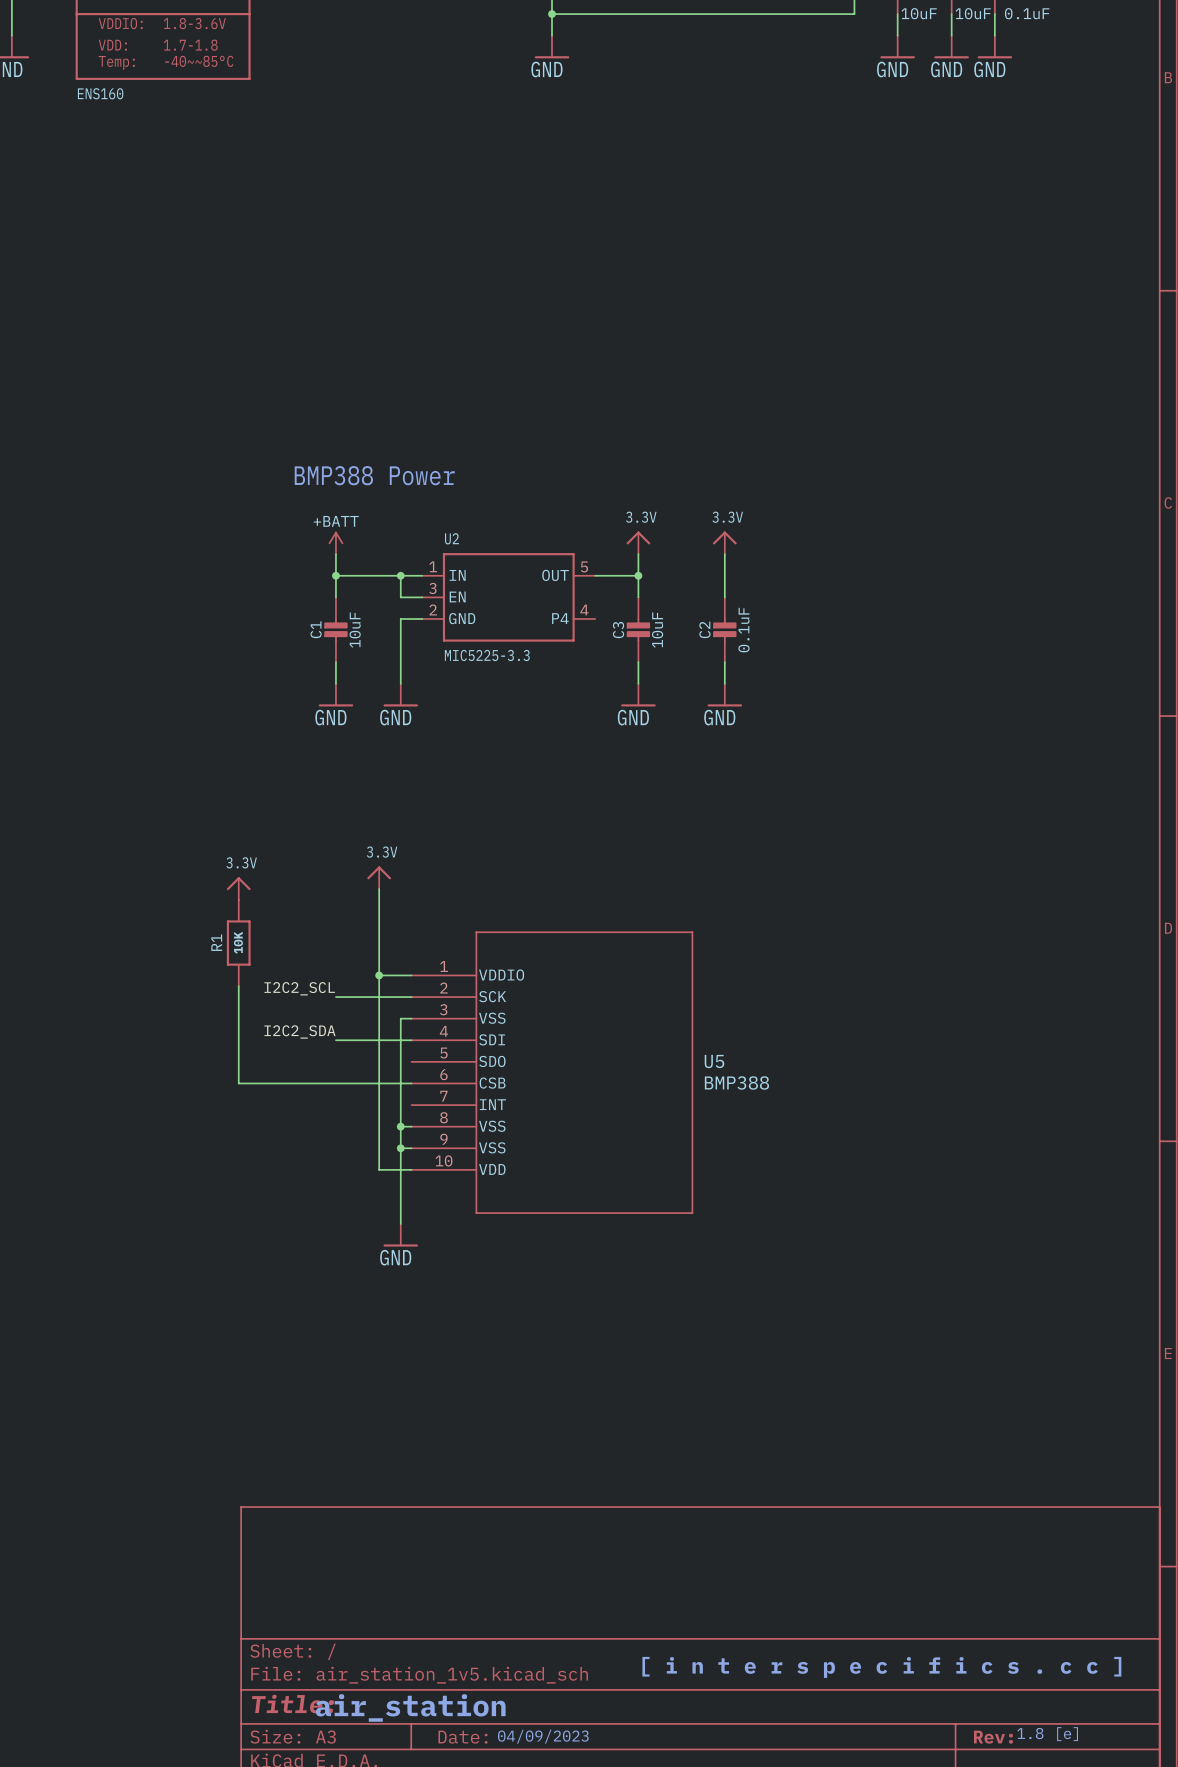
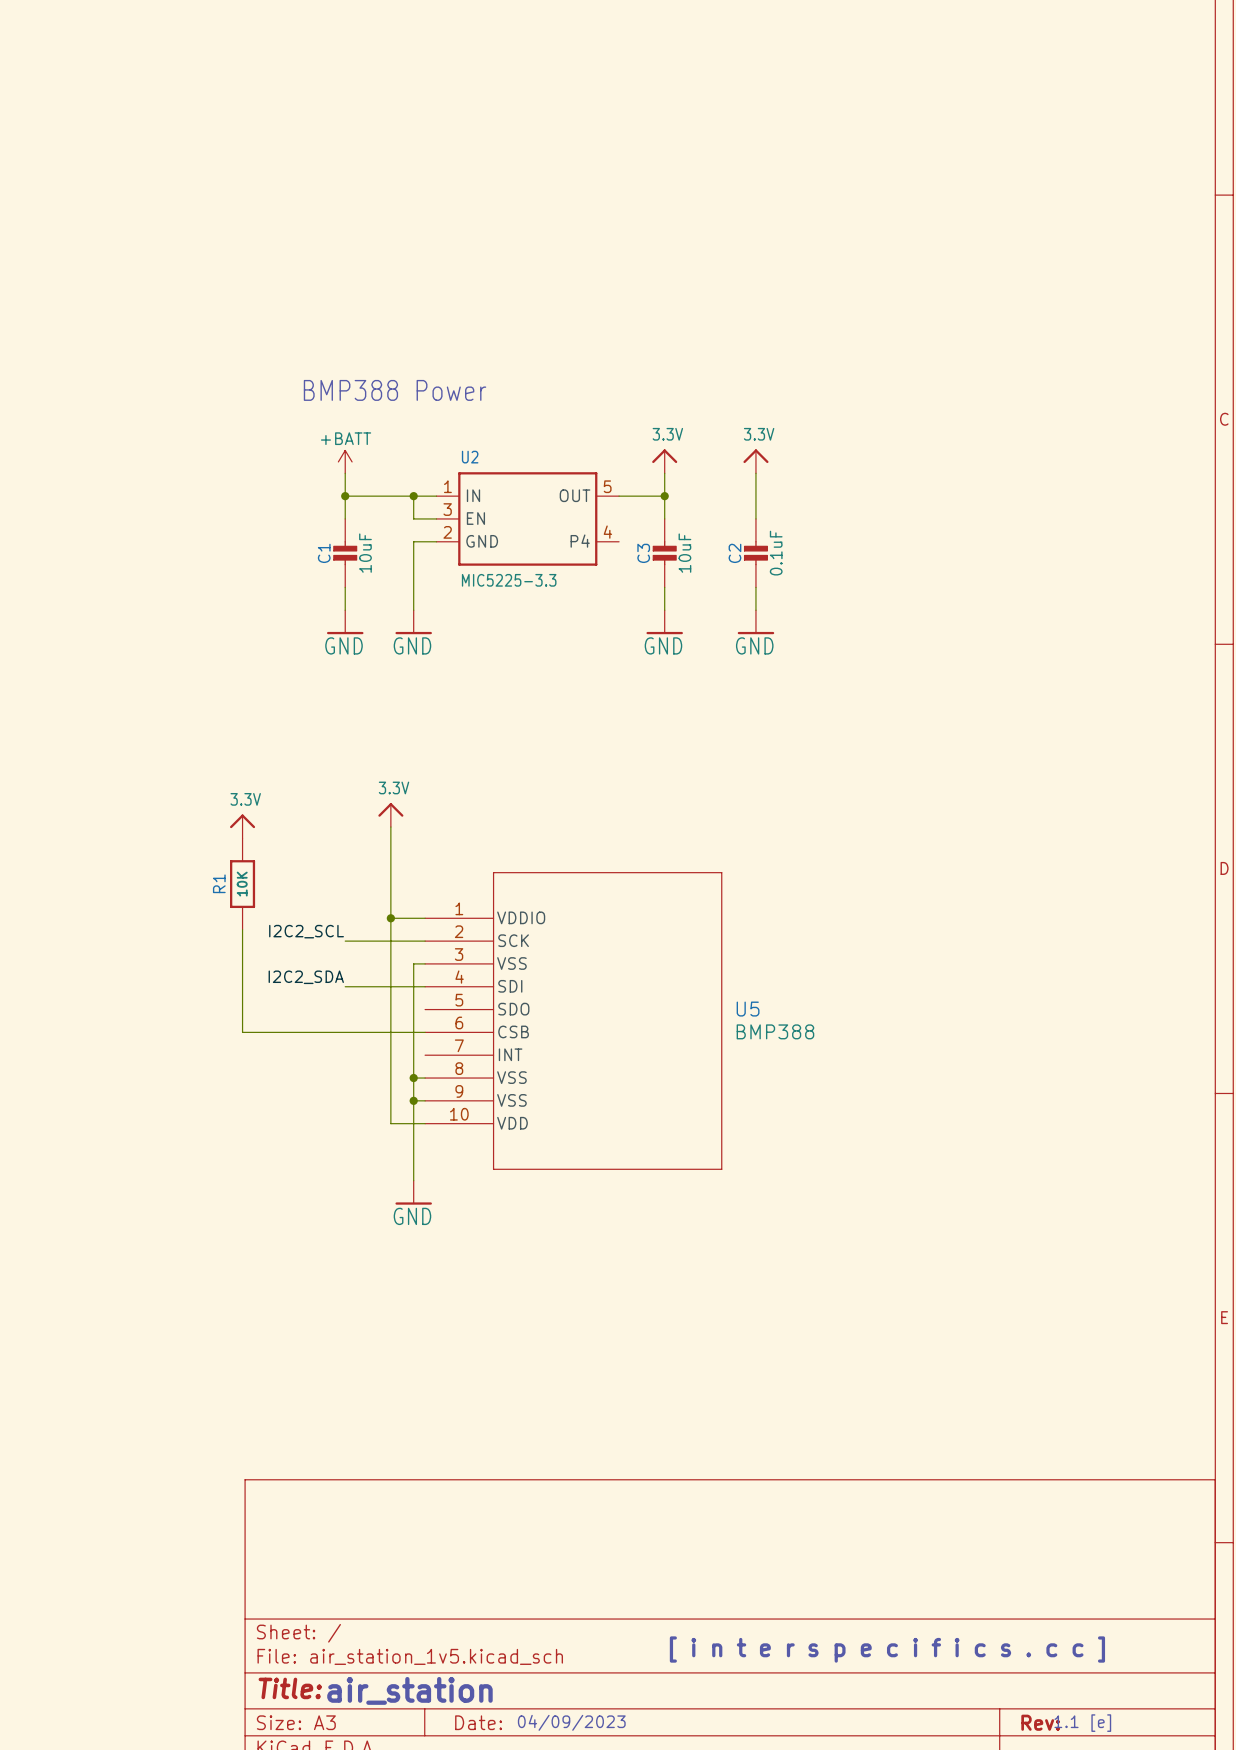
text: 1.8 [e] (1047, 1734) -> 1.1 [e] (1082, 1723)

